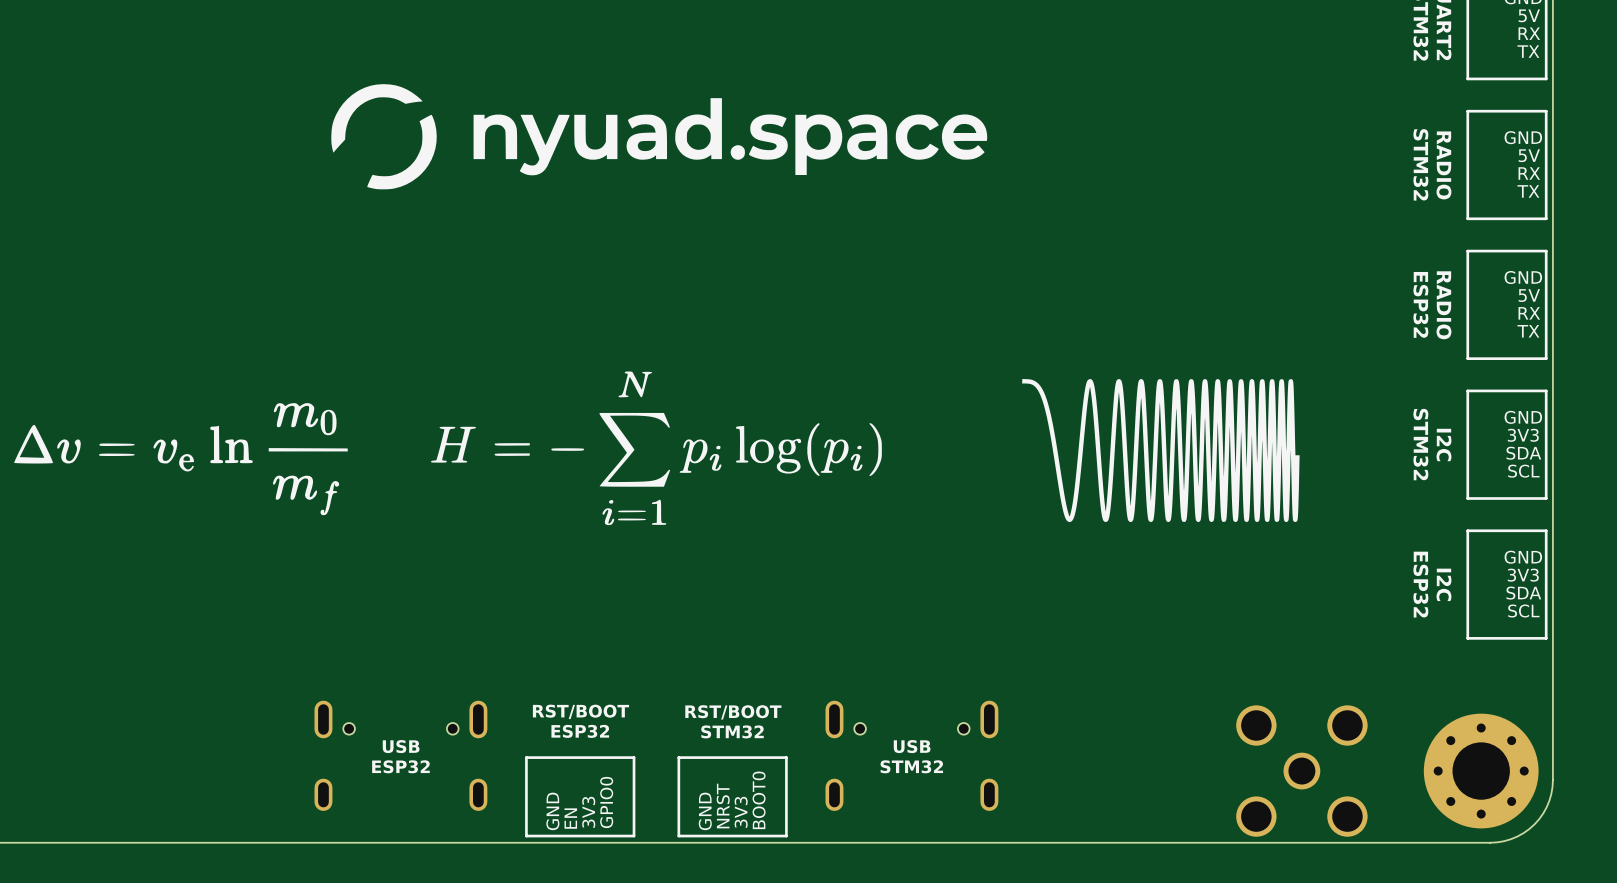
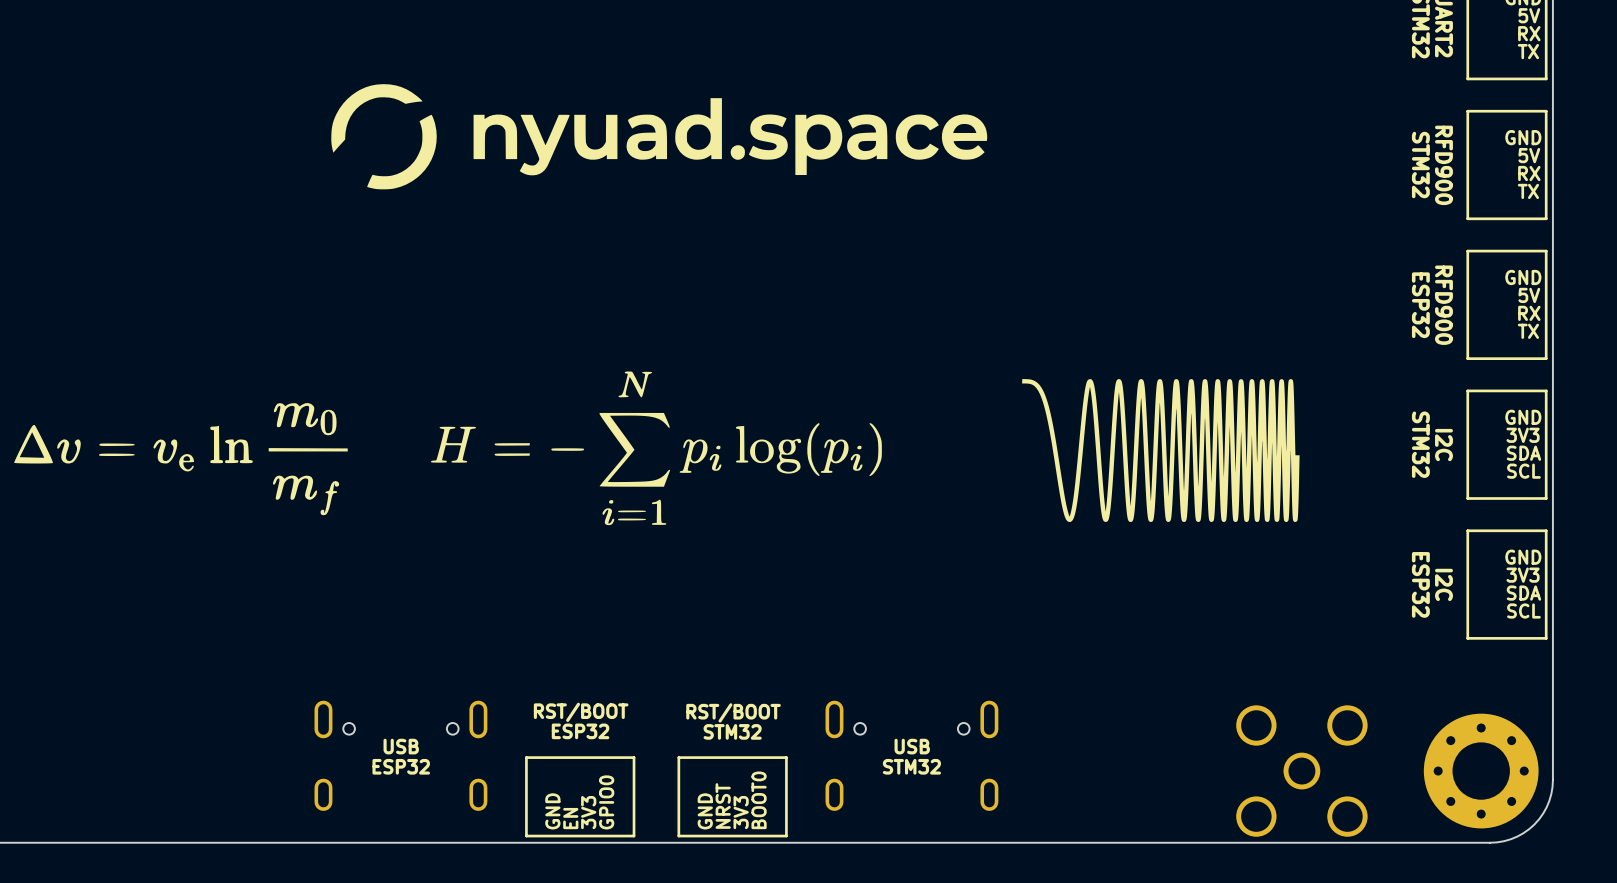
text: RADIO (1443, 165) -> RFD900 (1443, 165)
text: RADIO (1443, 305) -> RFD900 (1443, 305)

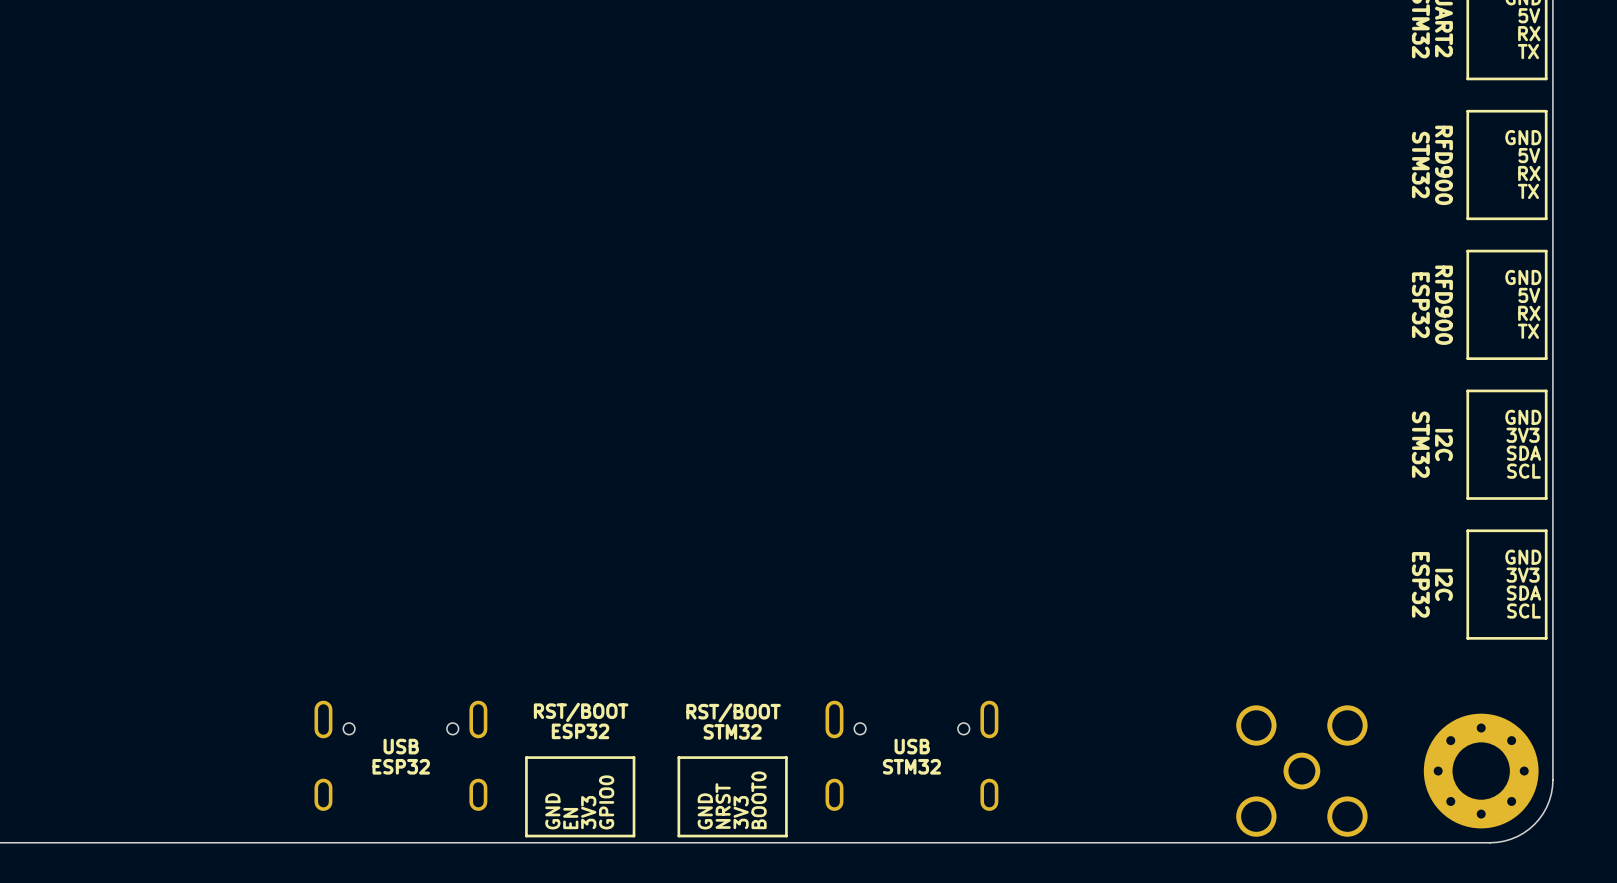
drawing: [331, 84, 988, 190] -> none
drawing: [430, 371, 882, 526] -> none
drawing: [1022, 379, 1300, 523] -> none
drawing: [14, 403, 348, 516] -> none

